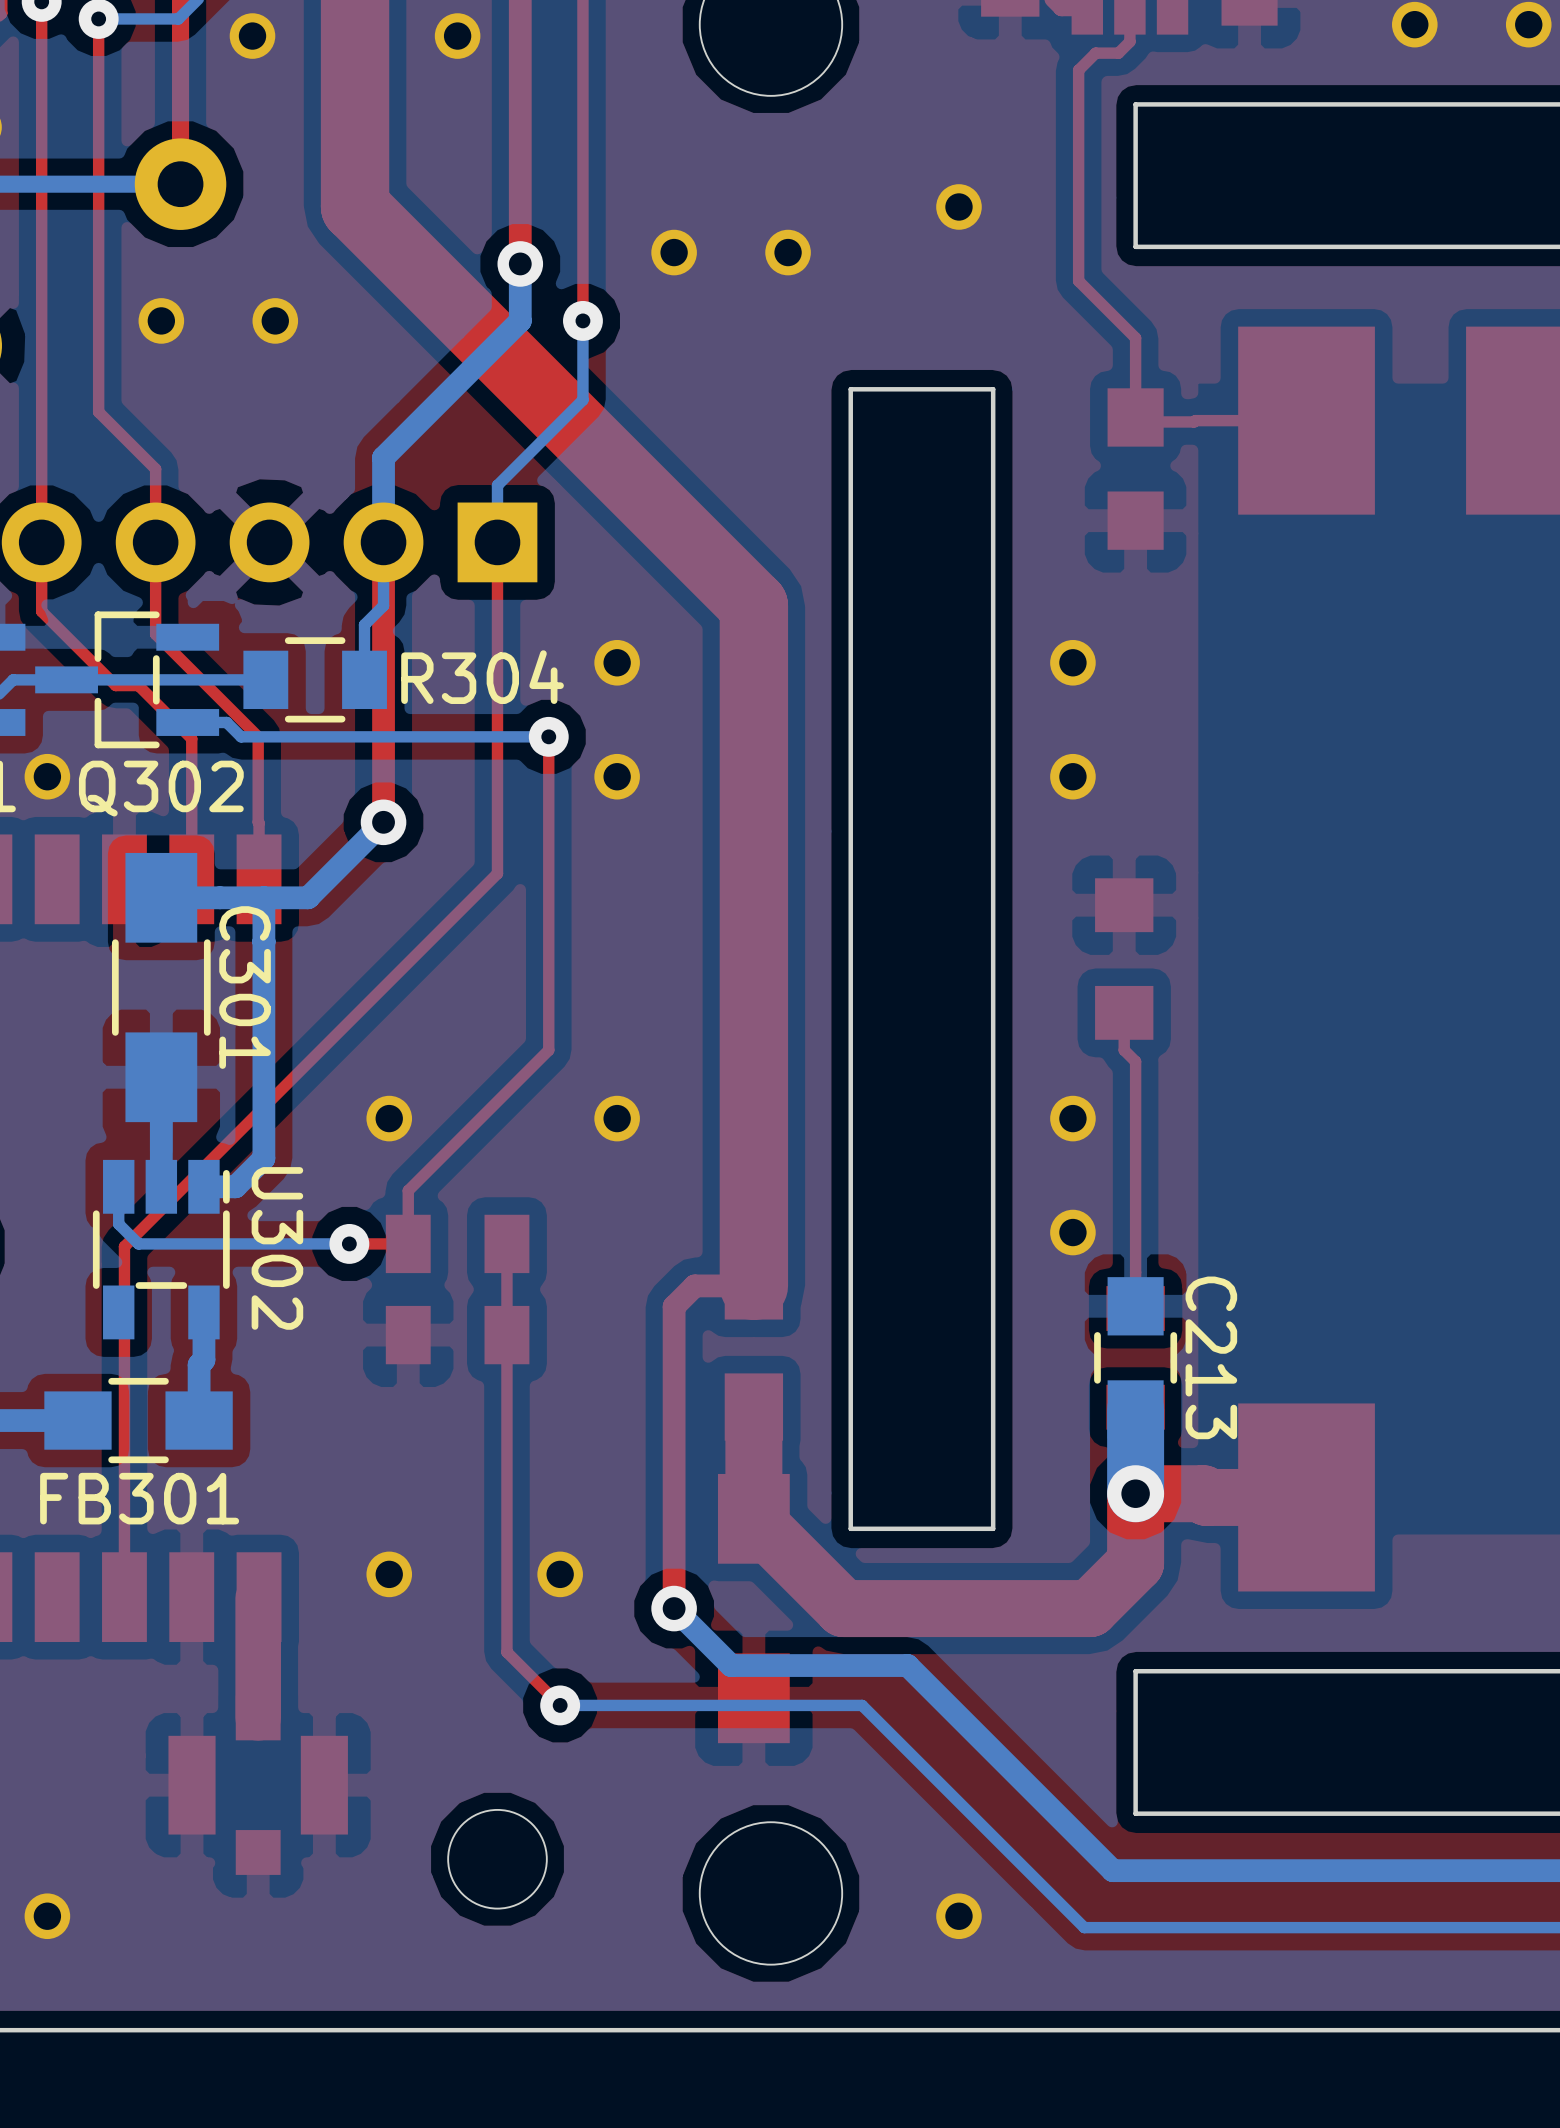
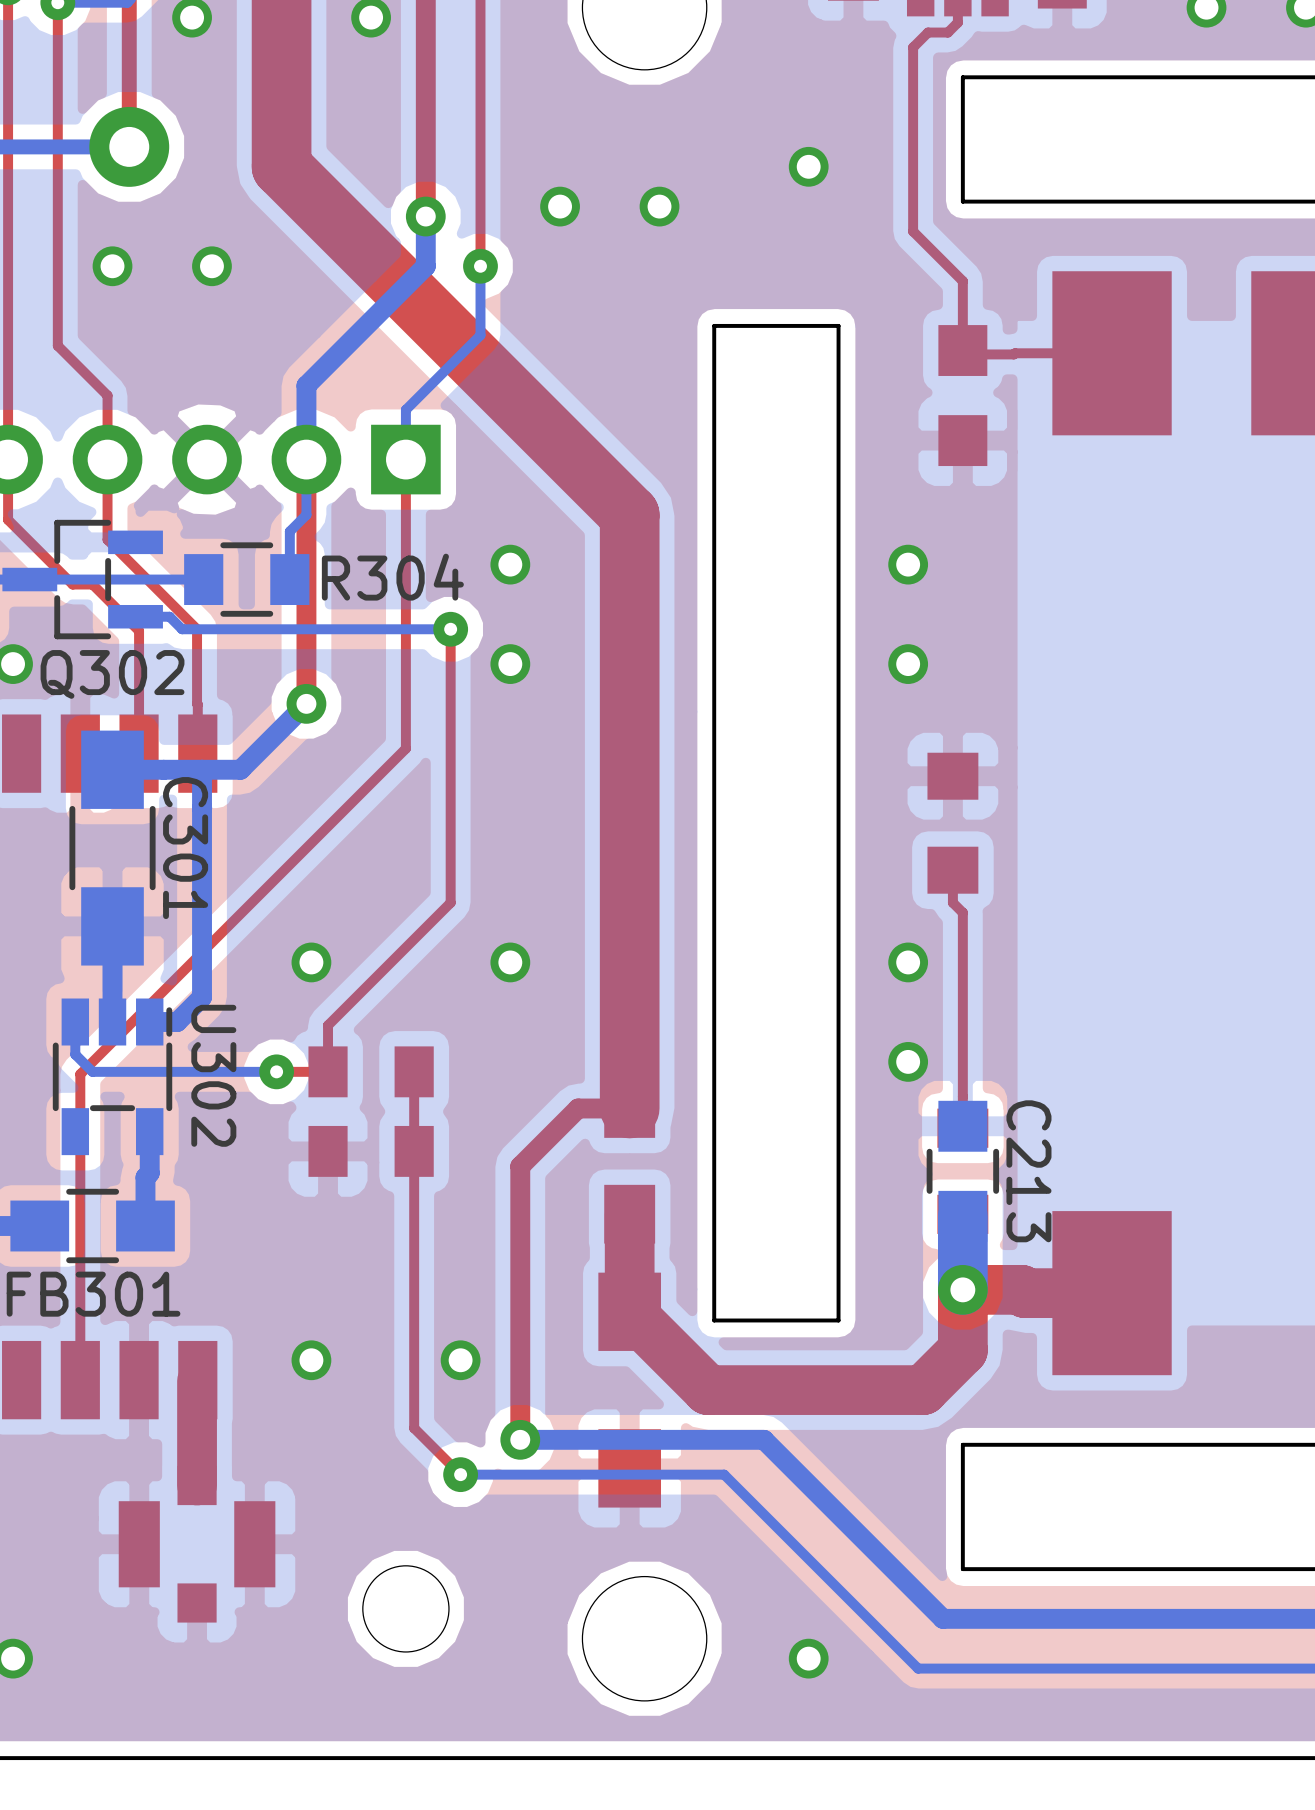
top track: (674, 1306) (674, 1608) -> (560, 1126) (520, 1166) (520, 1439)
bottom track: (674, 1608) (731, 1665) -> (520, 1439) (609, 1439)
via position: (674, 1608) -> (520, 1439)

